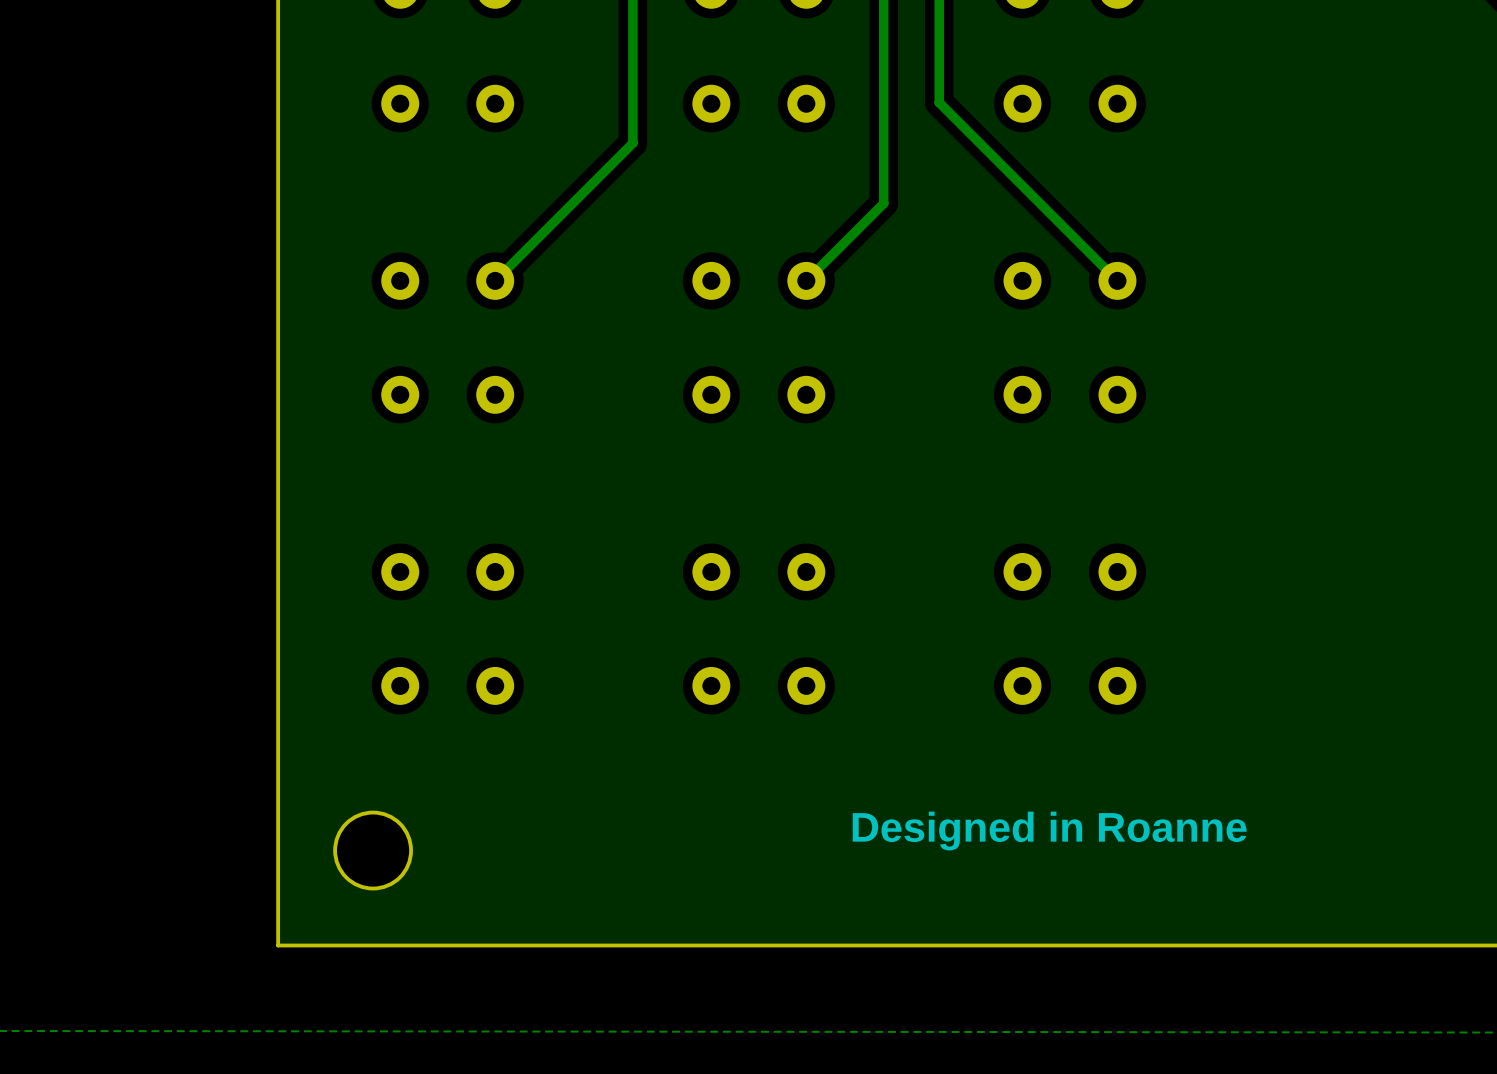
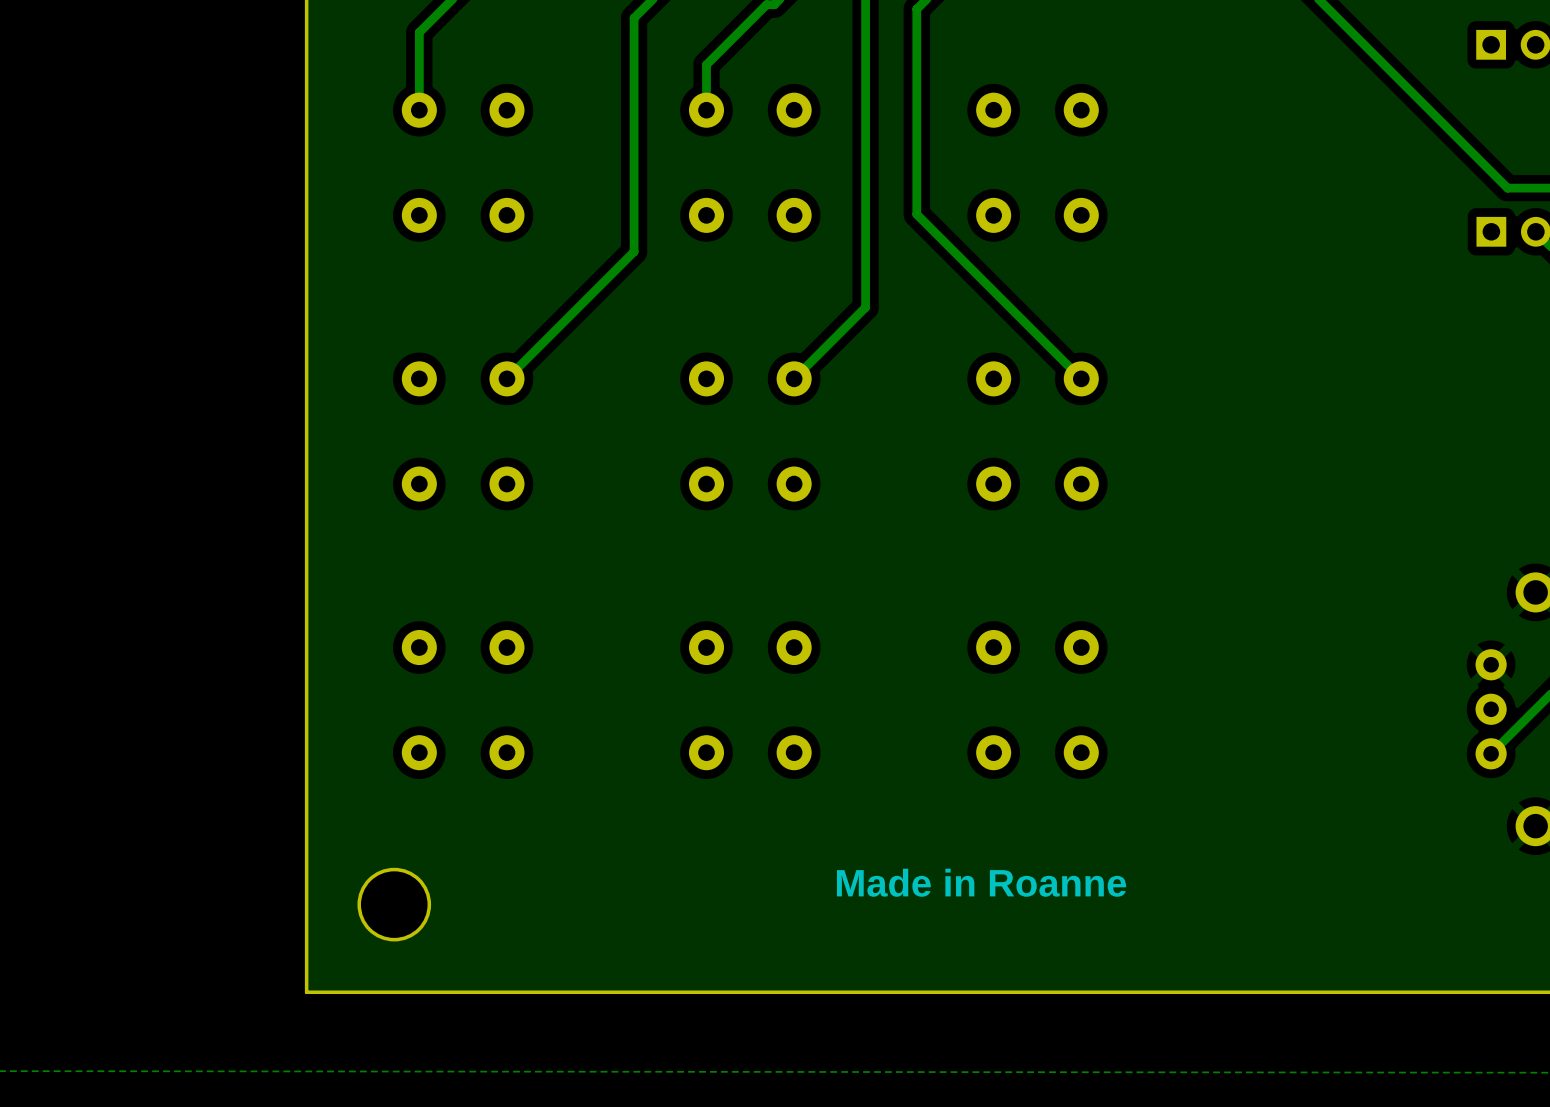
text: Designed in Roanne (1049, 831) -> Made in Roanne (981, 882)

